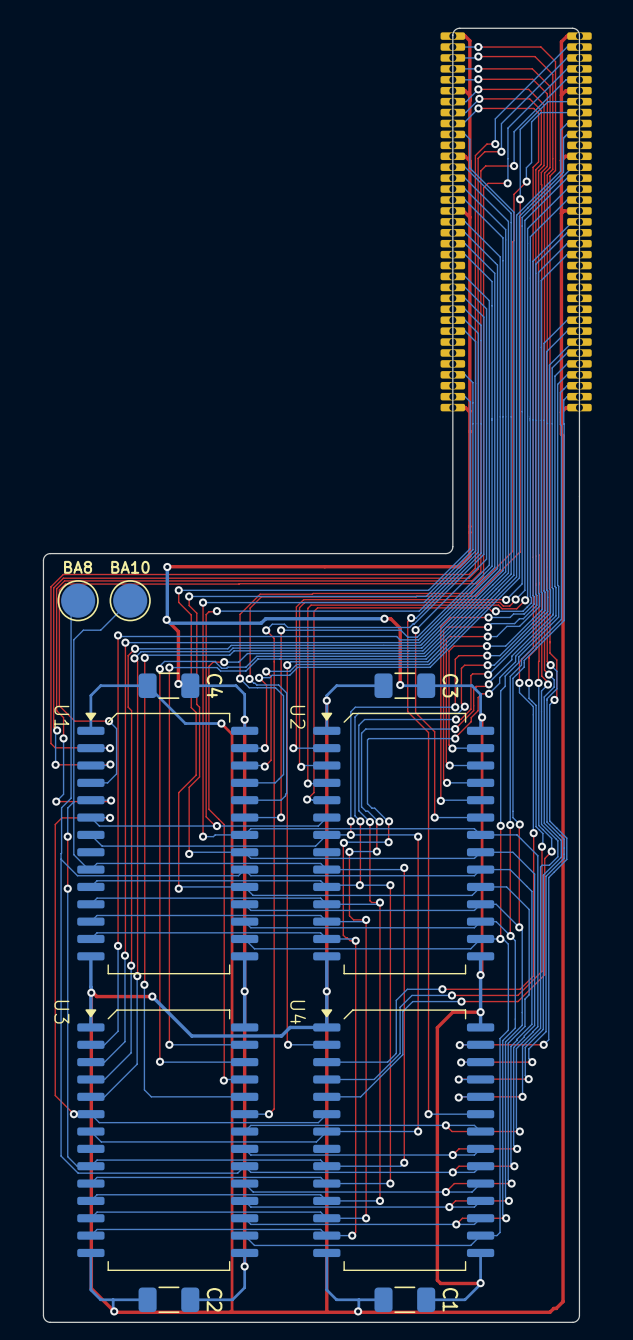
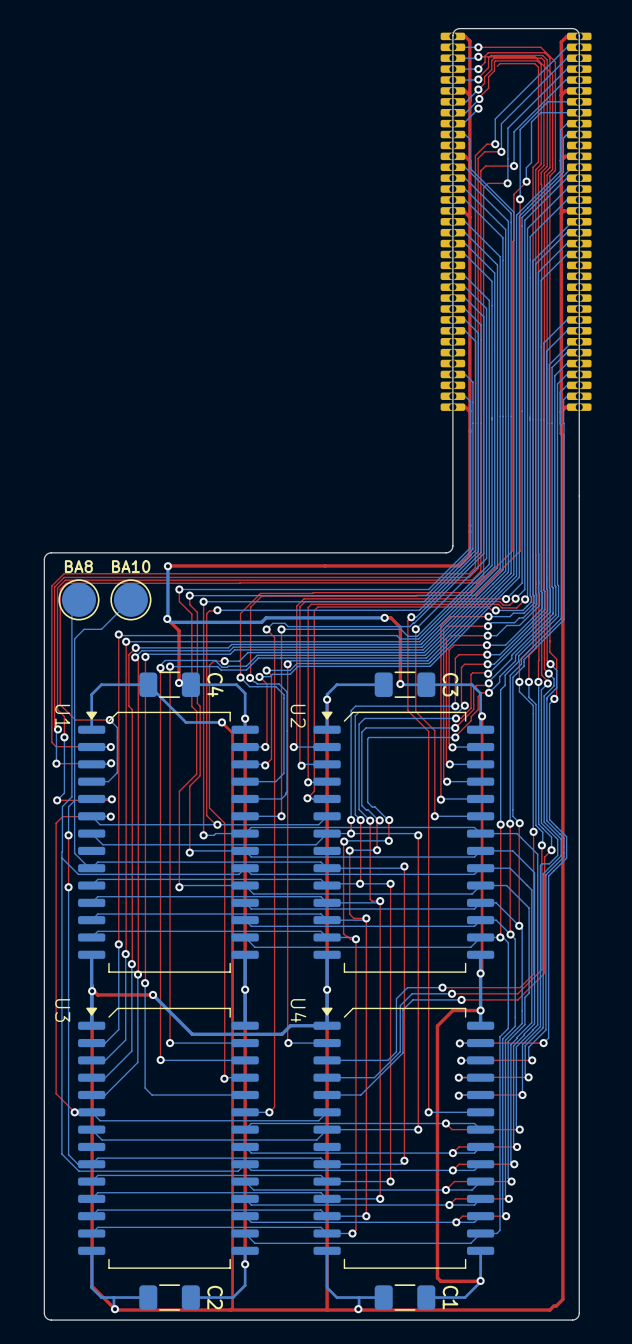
top track: (478, 68) (532, 68) (550, 86) -> (478, 69) (485, 62) (485, 55) (488, 52) (544, 52) (549, 57) (549, 86)
top track: (478, 79) (532, 79) (547, 93) -> (478, 79) (488, 67) (488, 58) (491, 55) (542, 55) (547, 60) (547, 94)
top track: (478, 89) (528, 89) (544, 104) -> (478, 89) (484, 83) (484, 77) (491, 69) (491, 60) (493, 58) (541, 58) (544, 61) (543, 104)
top track: (479, 98) (529, 98) (541, 110) -> (479, 97) (488, 88) (488, 76) (494, 70) (495, 60) (537, 60) (541, 64) (541, 110)
top track: (478, 108) (533, 108) (538, 113) -> (497, 66) (499, 63) (534, 63) (538, 67) (538, 113)

